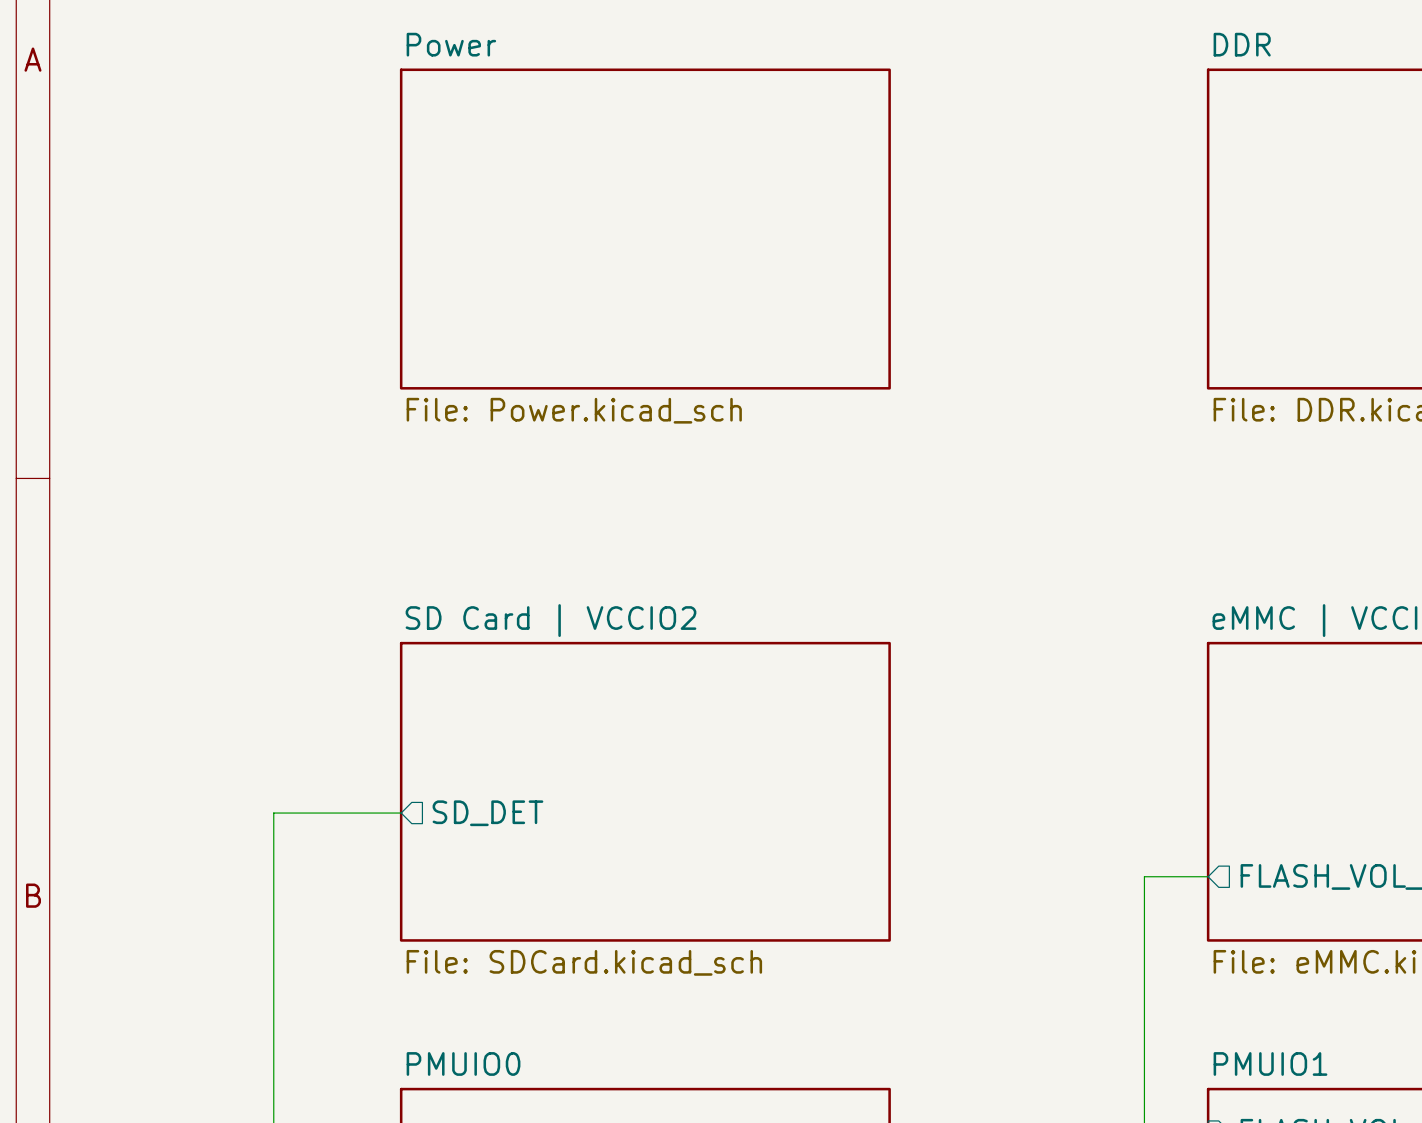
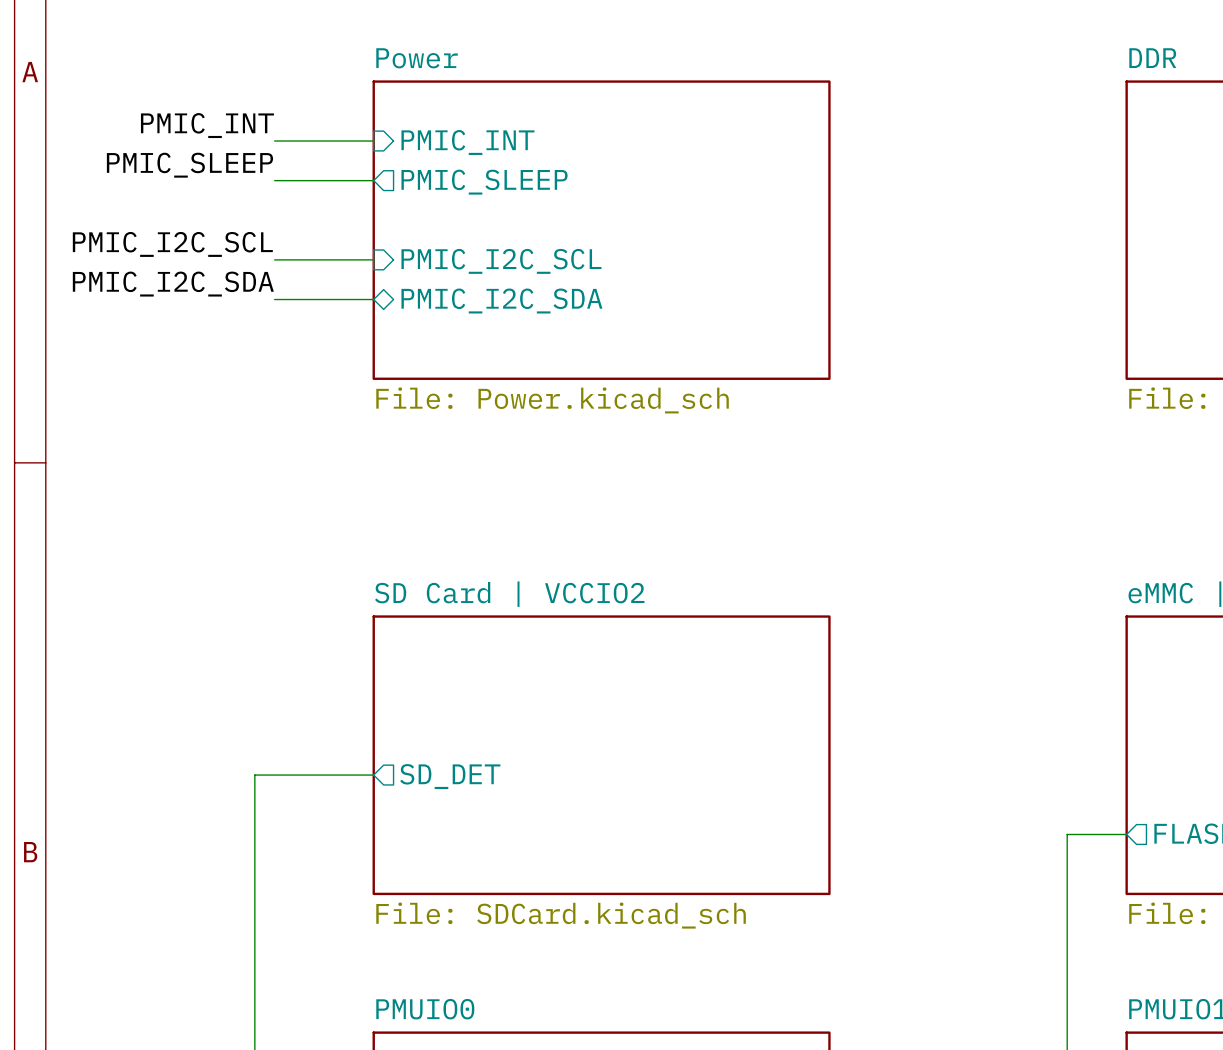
label: none -> PMIC_INT (207, 125)
wire: none -> (274, 141) (373, 141)
sheet pin: none -> PMIC_INT (467, 142)
label: none -> PMIC_SLEEP (189, 165)
wire: none -> (274, 180) (373, 180)
sheet pin: none -> PMIC_SLEEP (484, 182)
label: none -> PMIC_I2C_SCL (172, 244)
wire: none -> (274, 259) (373, 259)
sheet pin: none -> PMIC_I2C_SCL (501, 261)
label: none -> PMIC_I2C_SDA (173, 284)
wire: none -> (274, 299) (373, 299)
sheet pin: none -> PMIC_I2C_SDA (501, 301)

